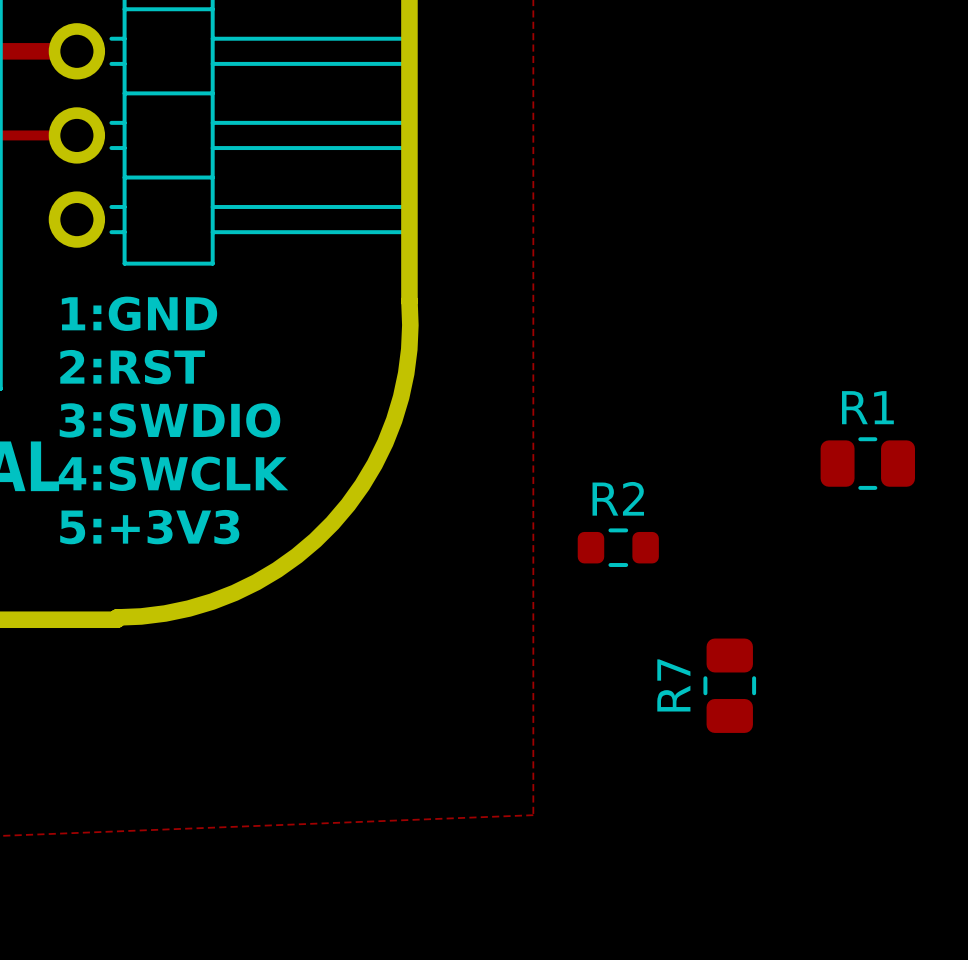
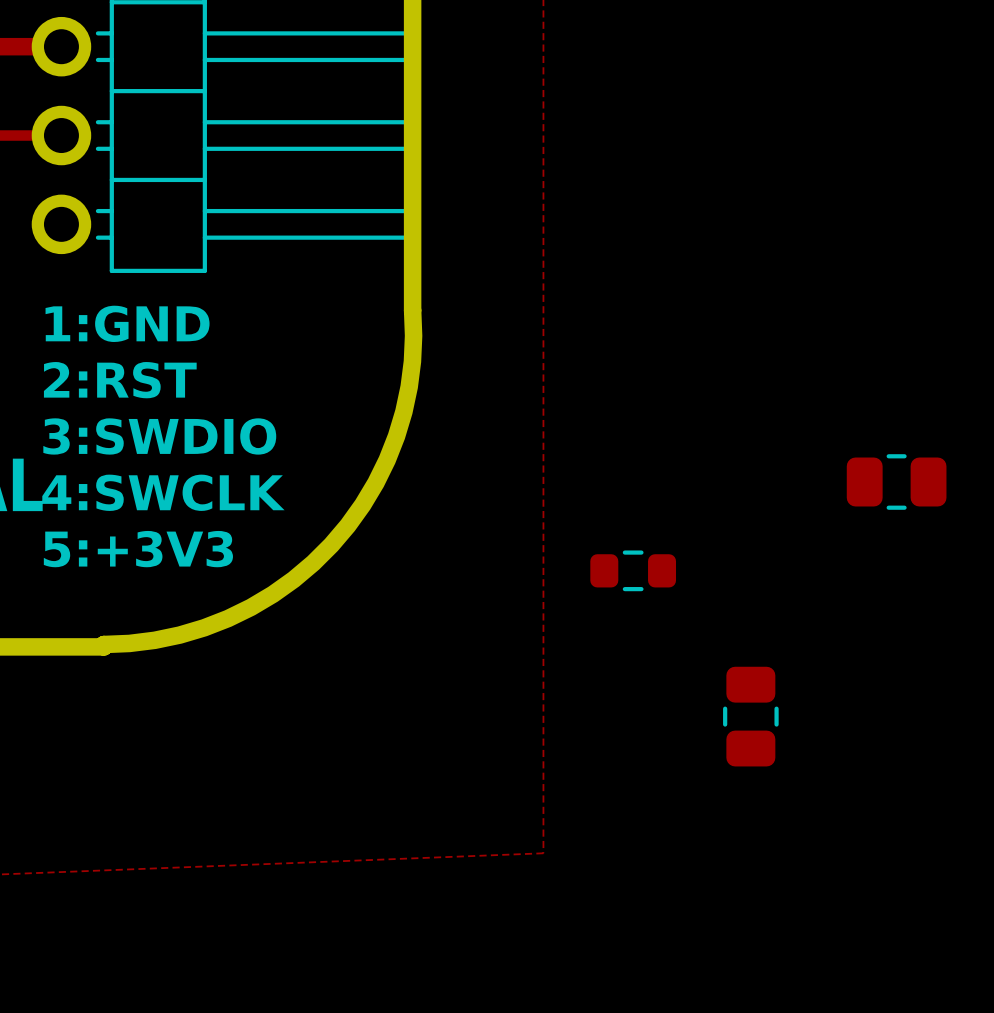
R1 name: R1 (867, 407) -> none
R2 name: R2 (618, 498) -> none
R7 name: R7 (673, 685) -> none

